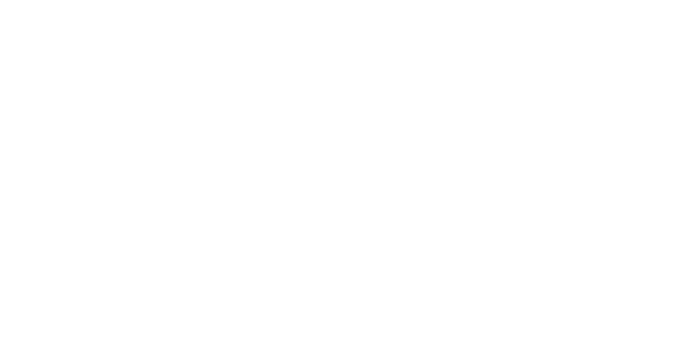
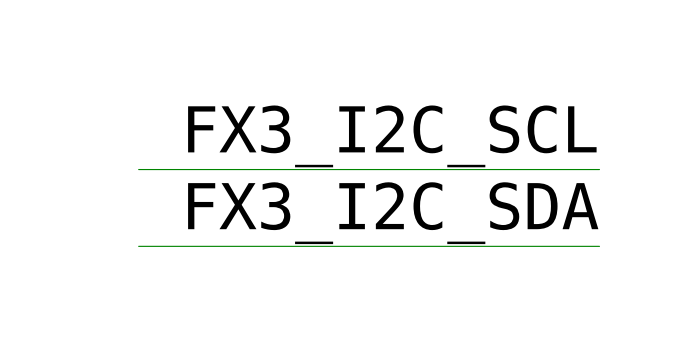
label: none -> FX3_I2C_SCL (392, 136)
wire: none -> (138, 169) (599, 169)
label: none -> FX3_I2C_SDA (393, 213)
wire: none -> (138, 246) (599, 246)

